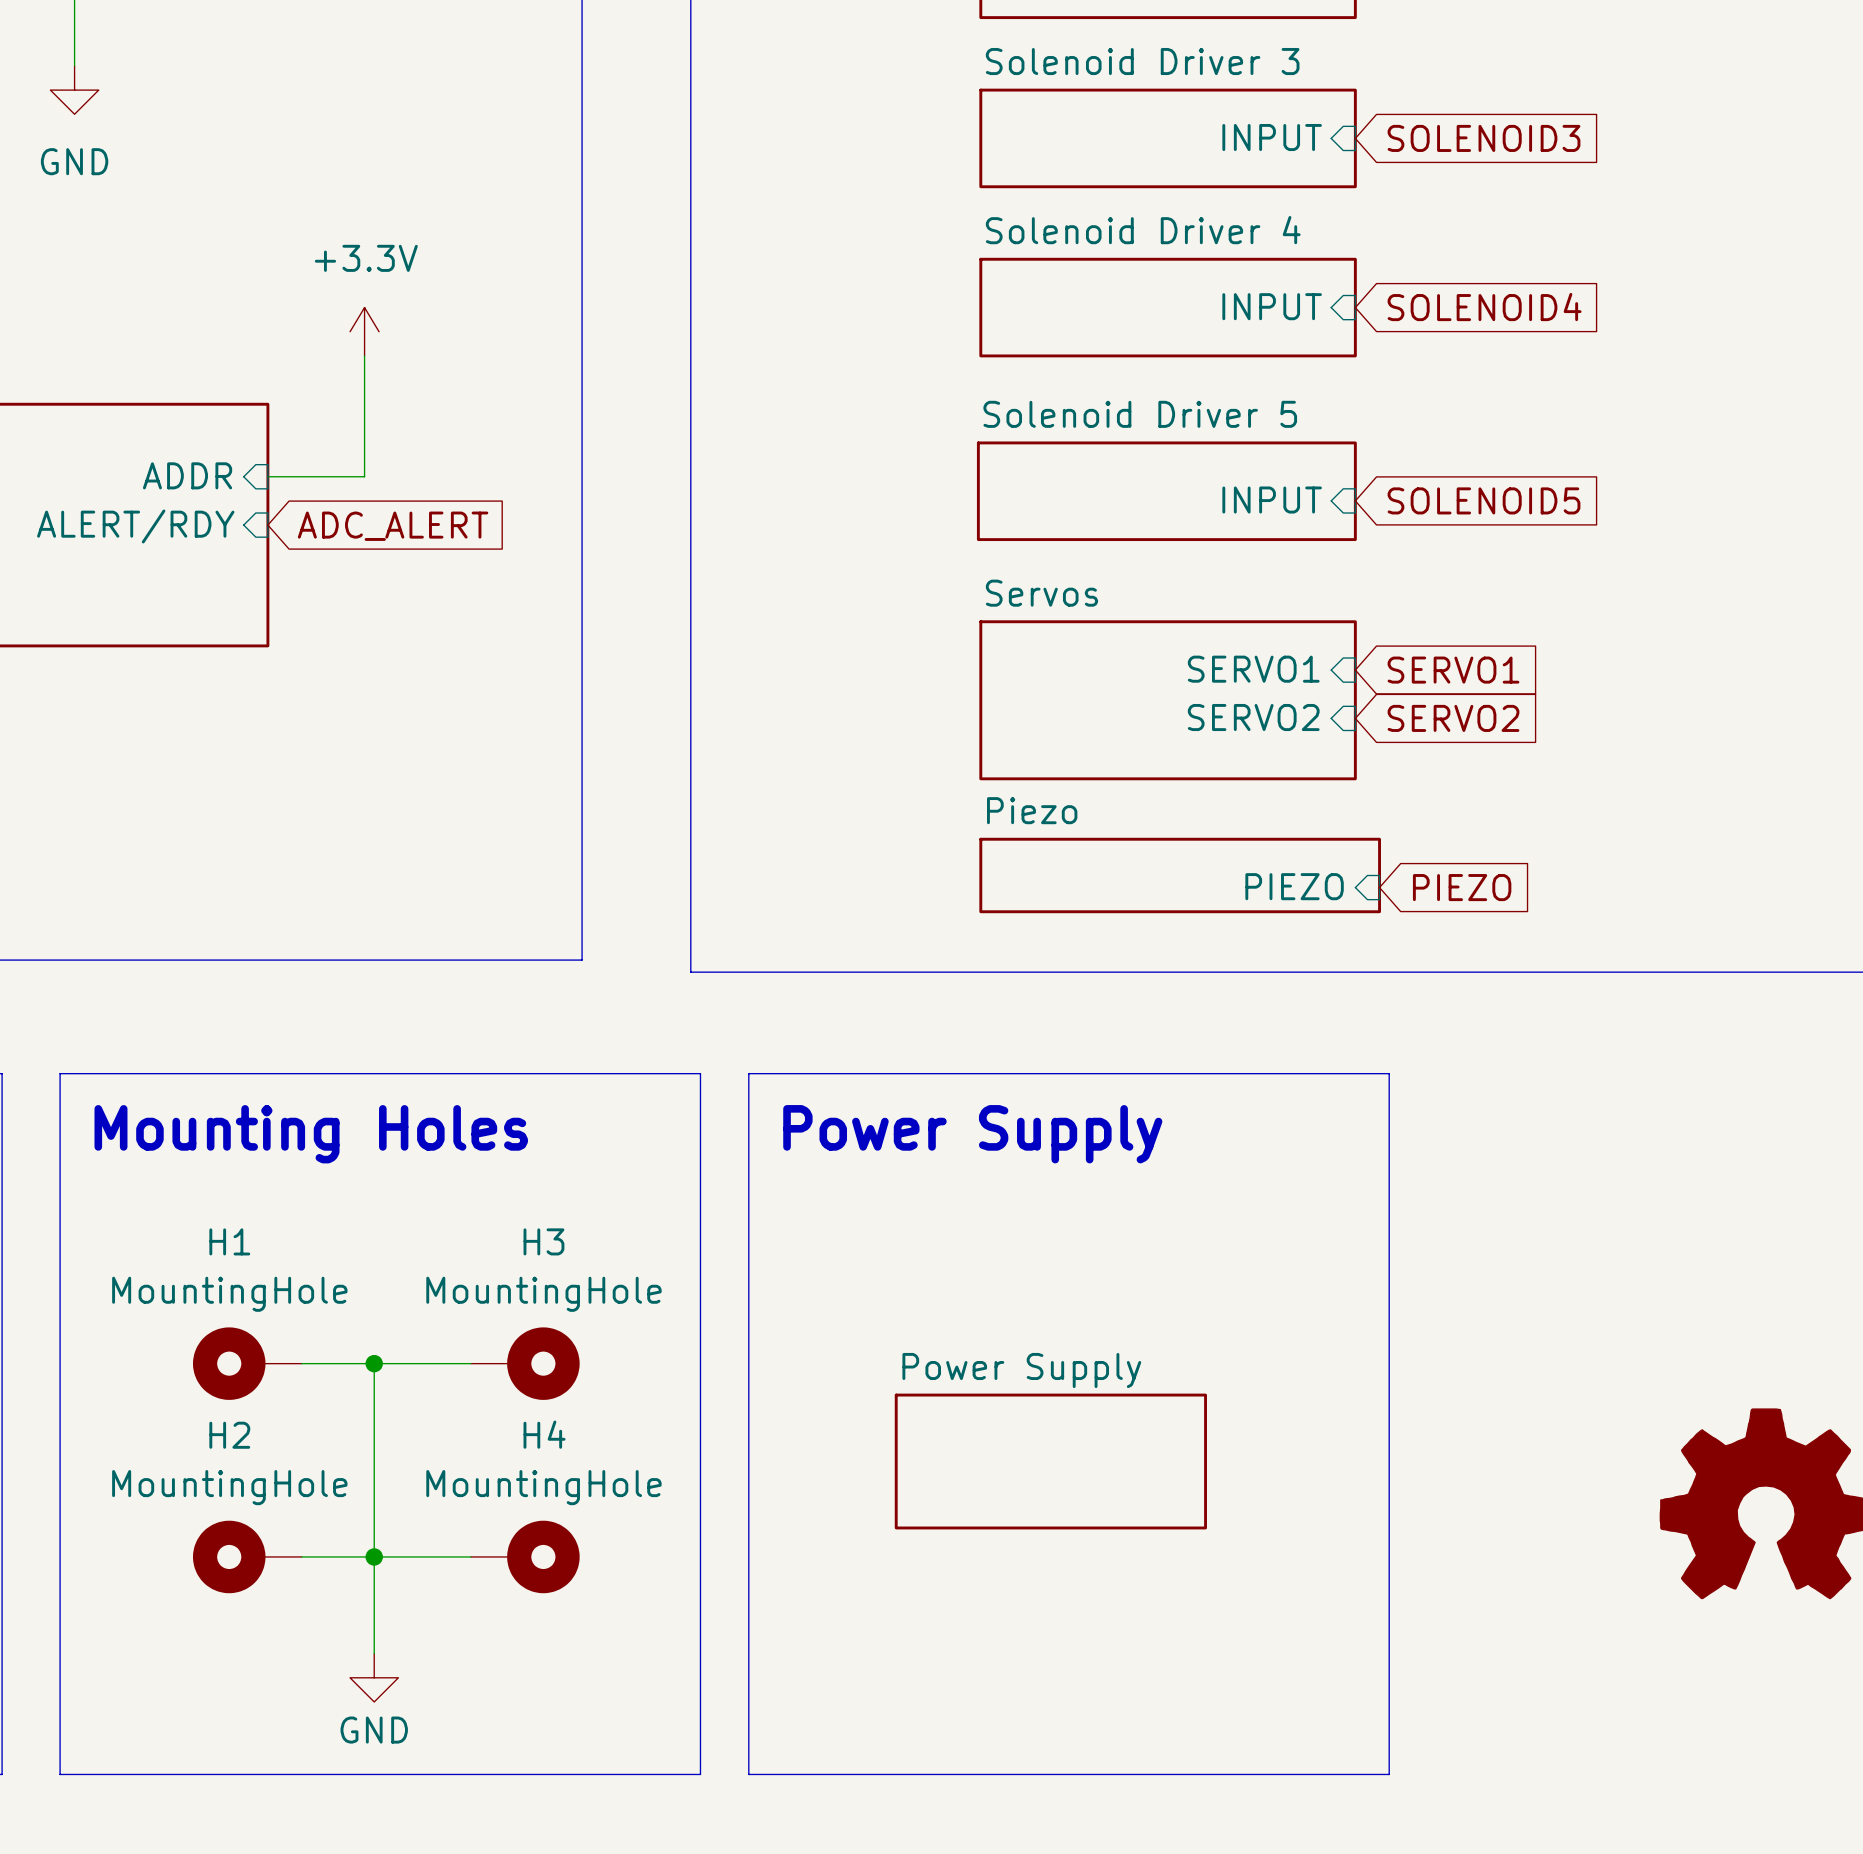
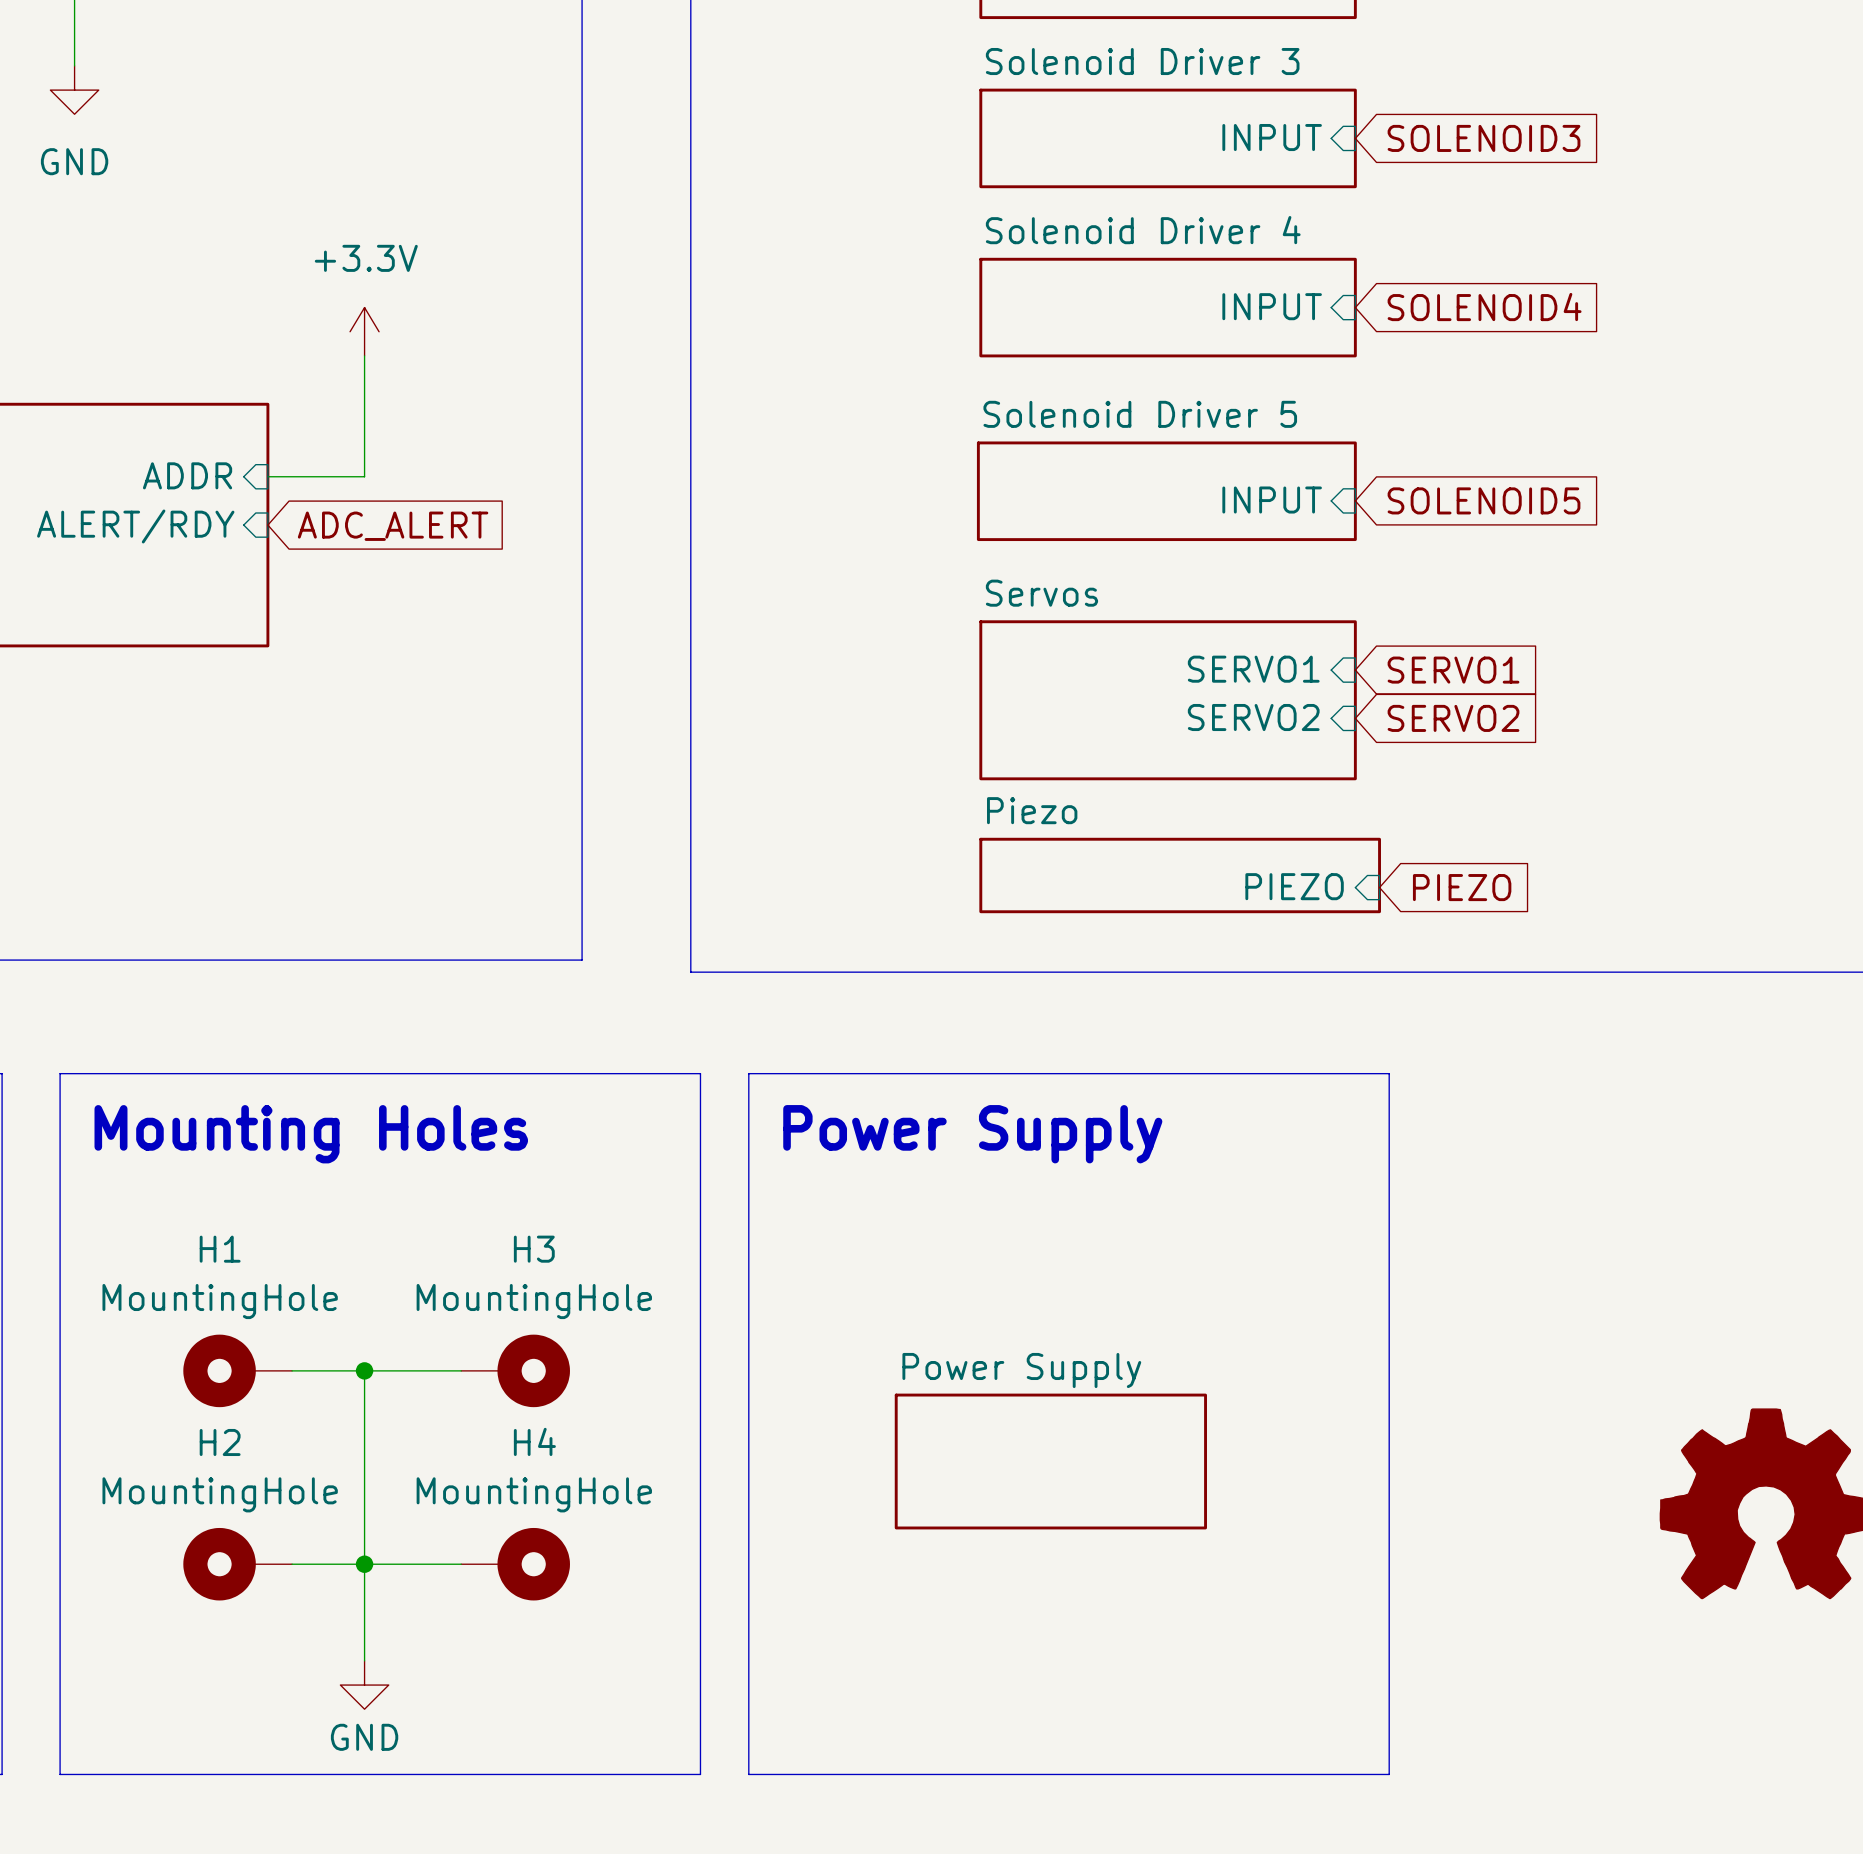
H1 position: (247, 1363) -> (237, 1370)
wire: (301, 1363) (470, 1363) -> (292, 1370) (461, 1370)
wire: (374, 1363) (374, 1653) -> (364, 1370) (364, 1660)
junction position: (374, 1363) -> (364, 1370)
H3 position: (525, 1363) -> (515, 1370)
H2 position: (247, 1556) -> (237, 1564)
wire: (301, 1556) (470, 1556) -> (292, 1564) (461, 1564)
junction position: (374, 1556) -> (364, 1564)
H4 position: (525, 1556) -> (515, 1564)
power symbol position: GND (374, 1677) -> GND (364, 1685)

